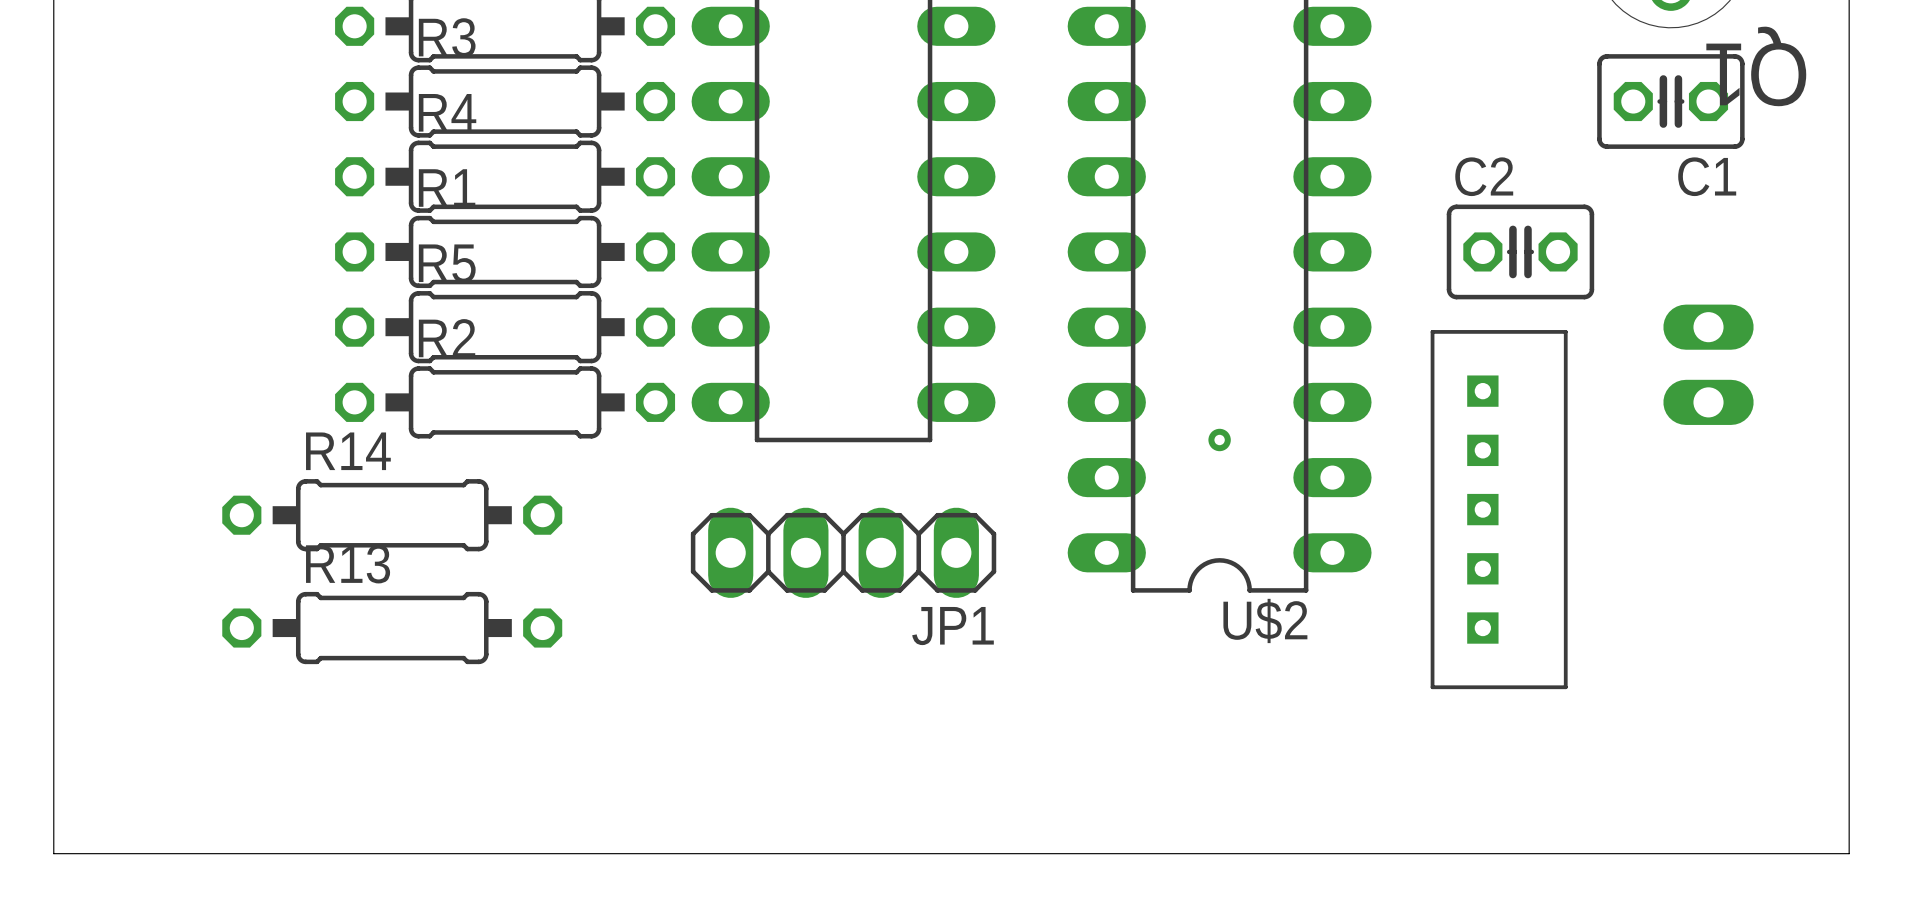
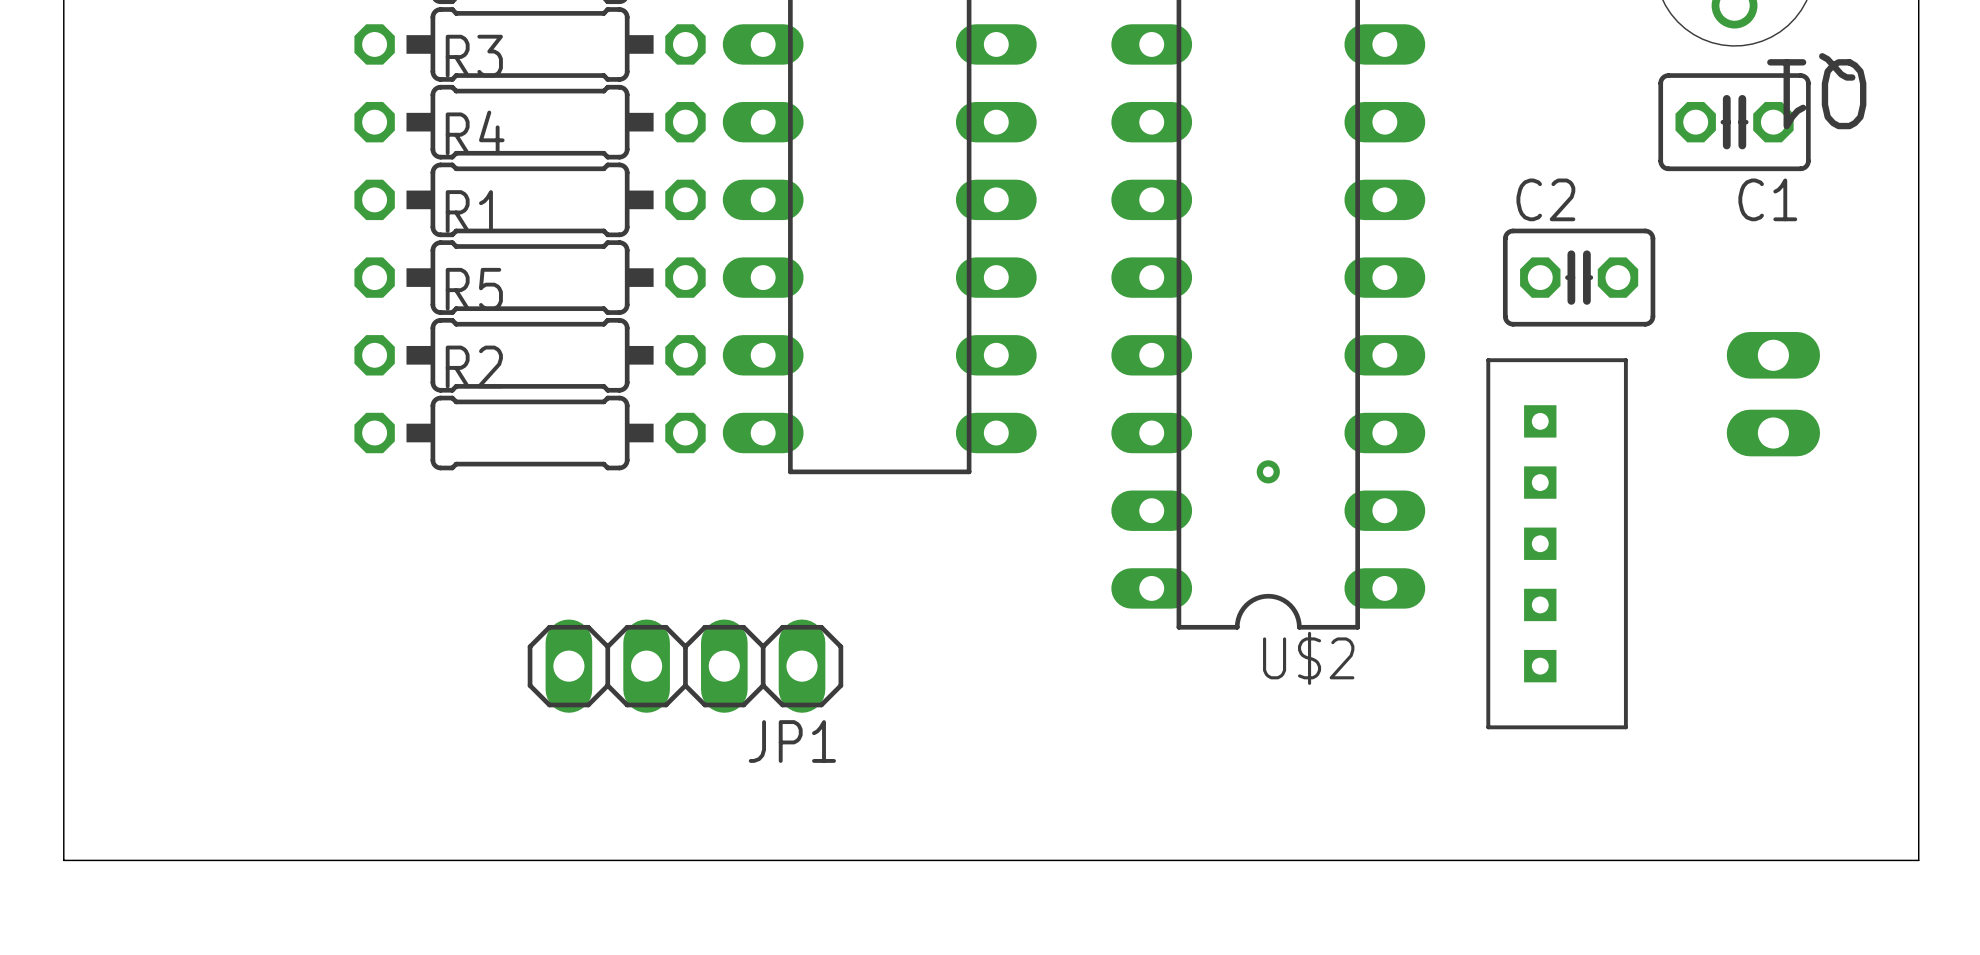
R14: (392, 515) -> none
JP1 position: (843, 552) -> (685, 666)
R13: (392, 628) -> none
board edge: (53, 816) (53, 853) (1849, 853) (1849, 816) -> (63, 860) (1918, 860)

